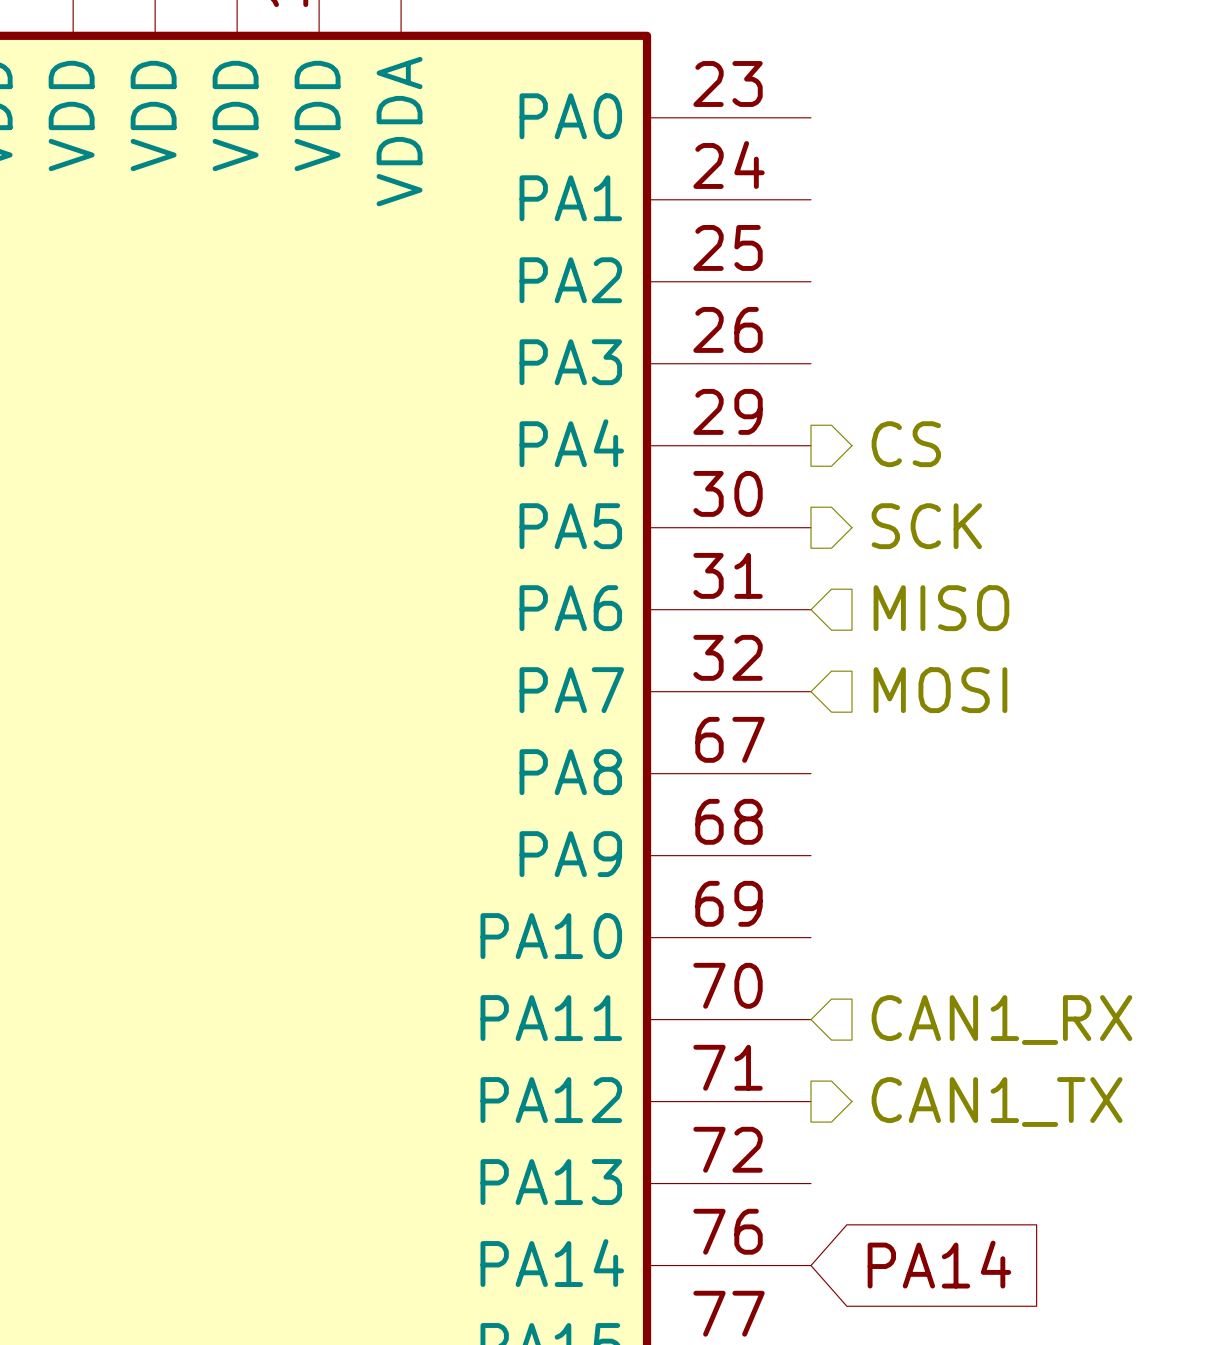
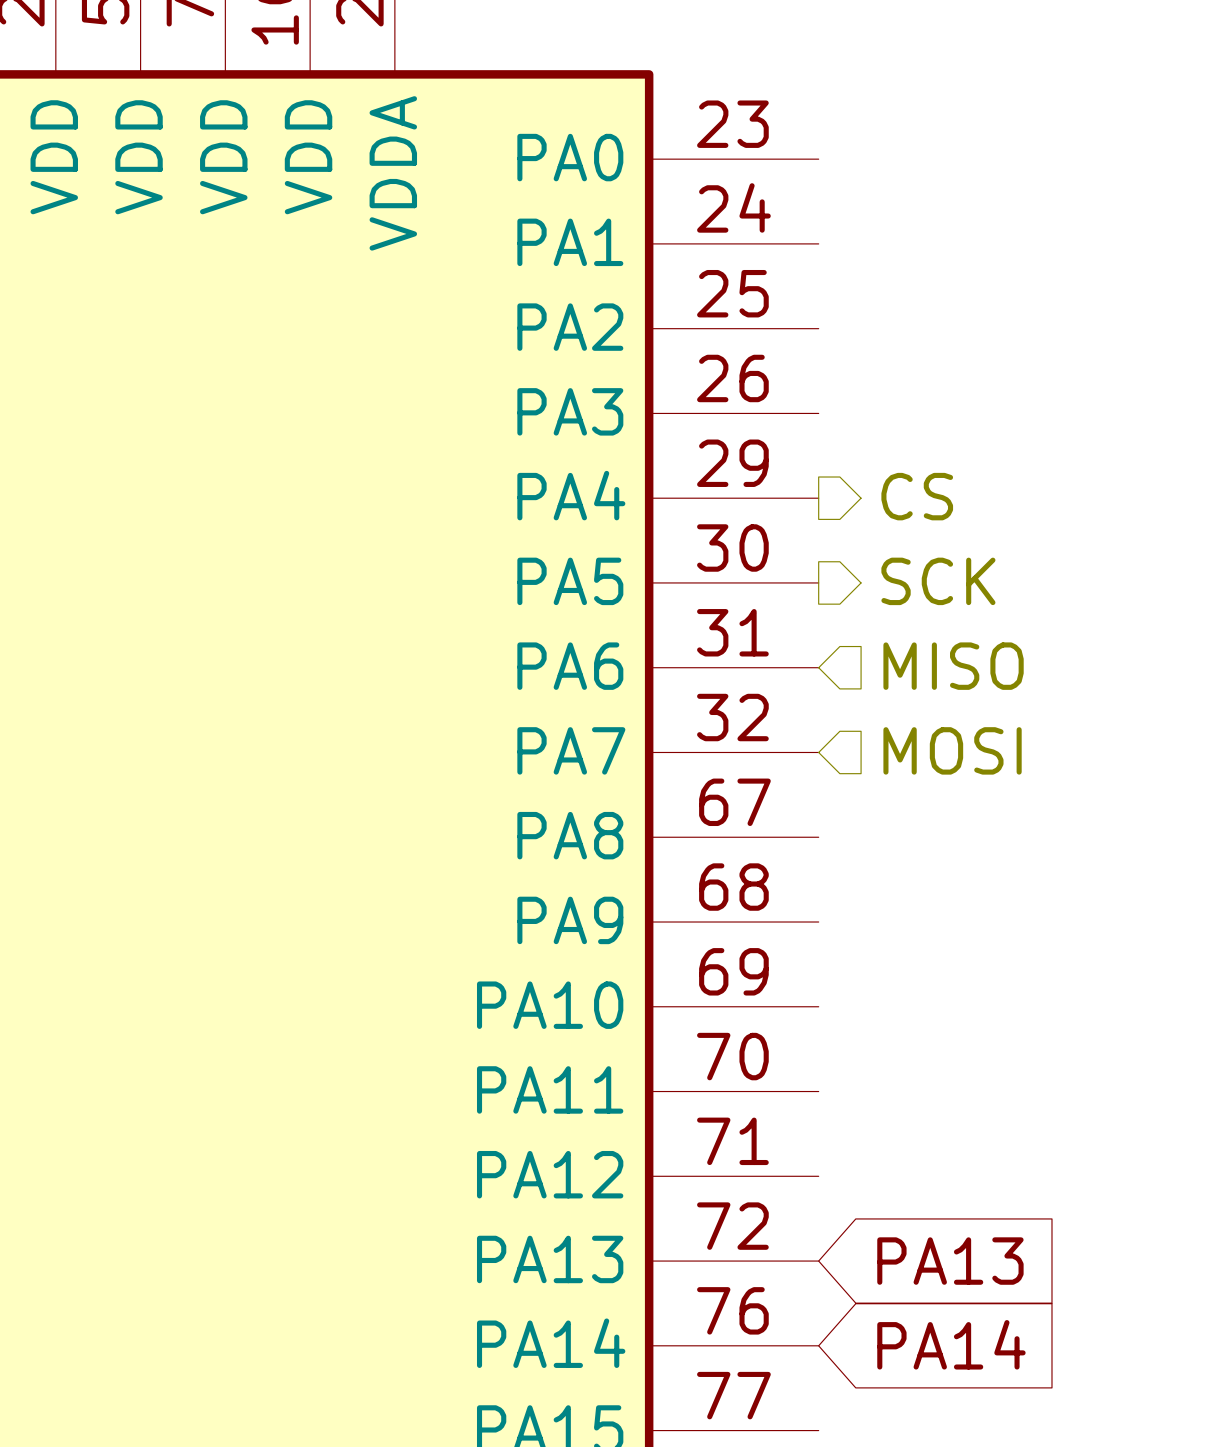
hierarchical label: CAN1_RX (1001, 1020) -> none
hierarchical label: CAN1_TX (997, 1102) -> none
global label: none -> PA13 (950, 1261)

